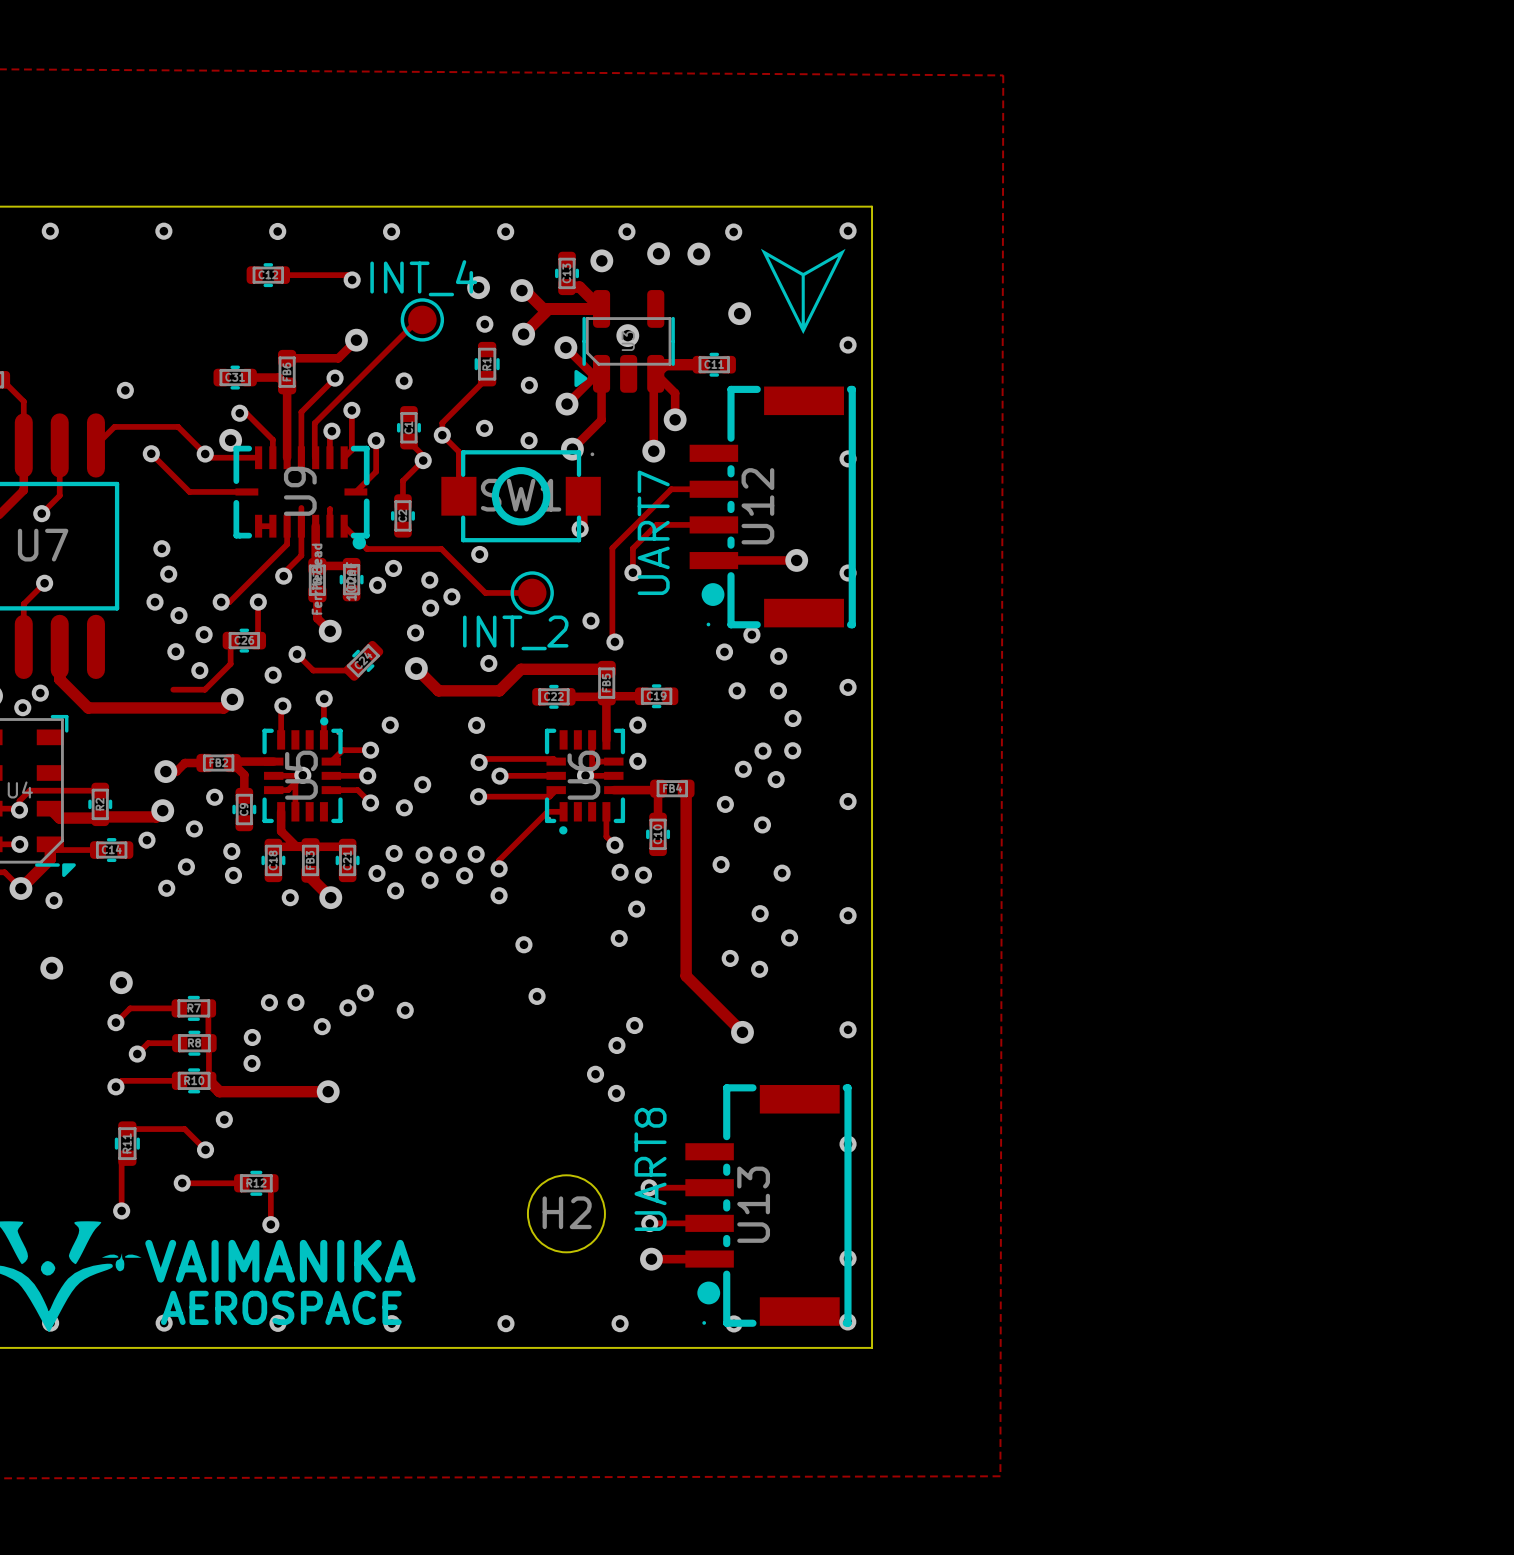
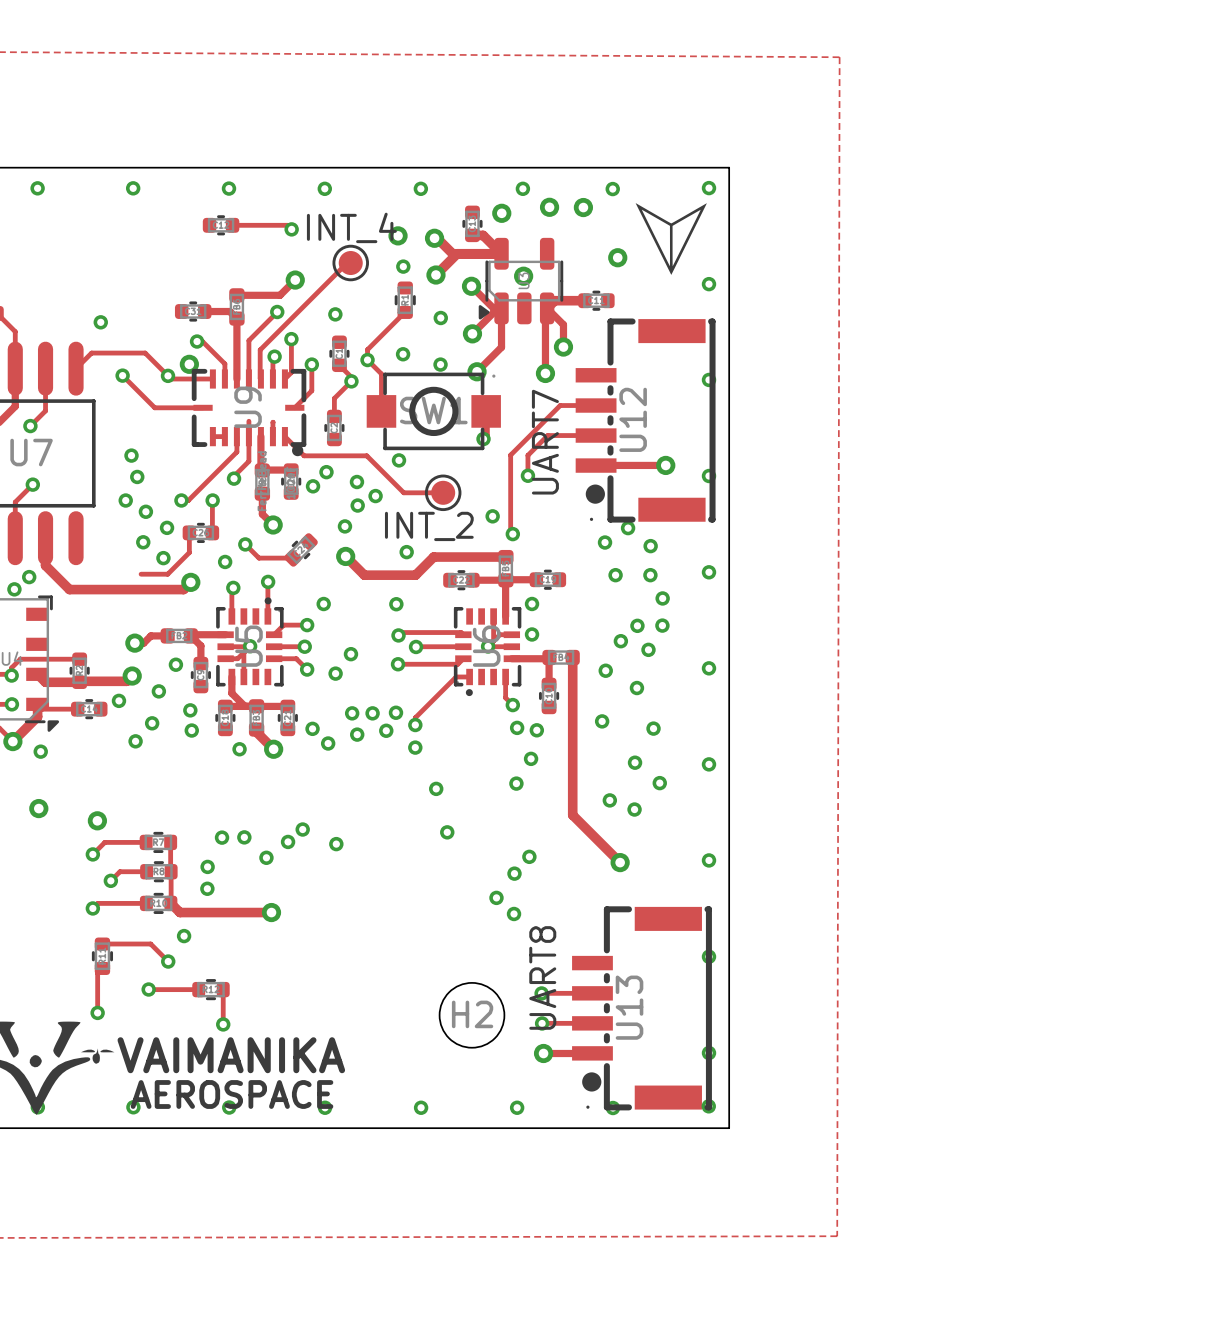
via: (394, 853) -> none

